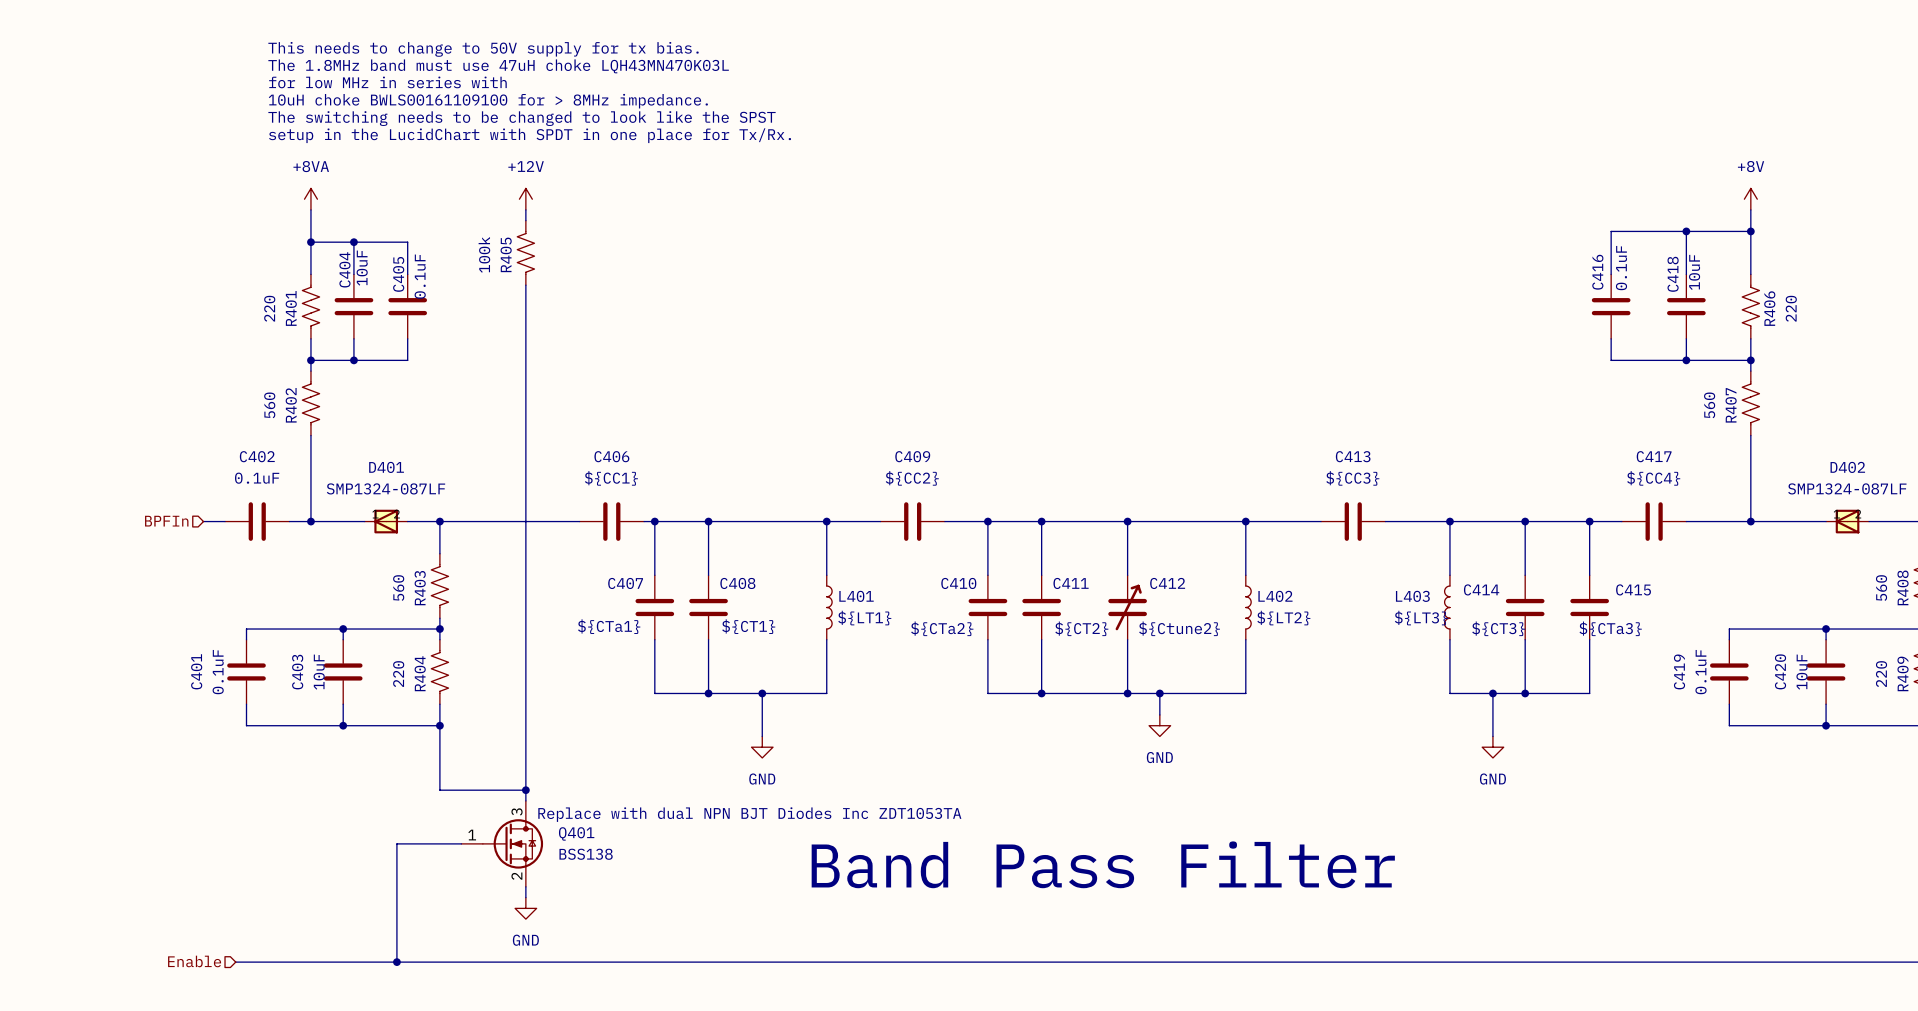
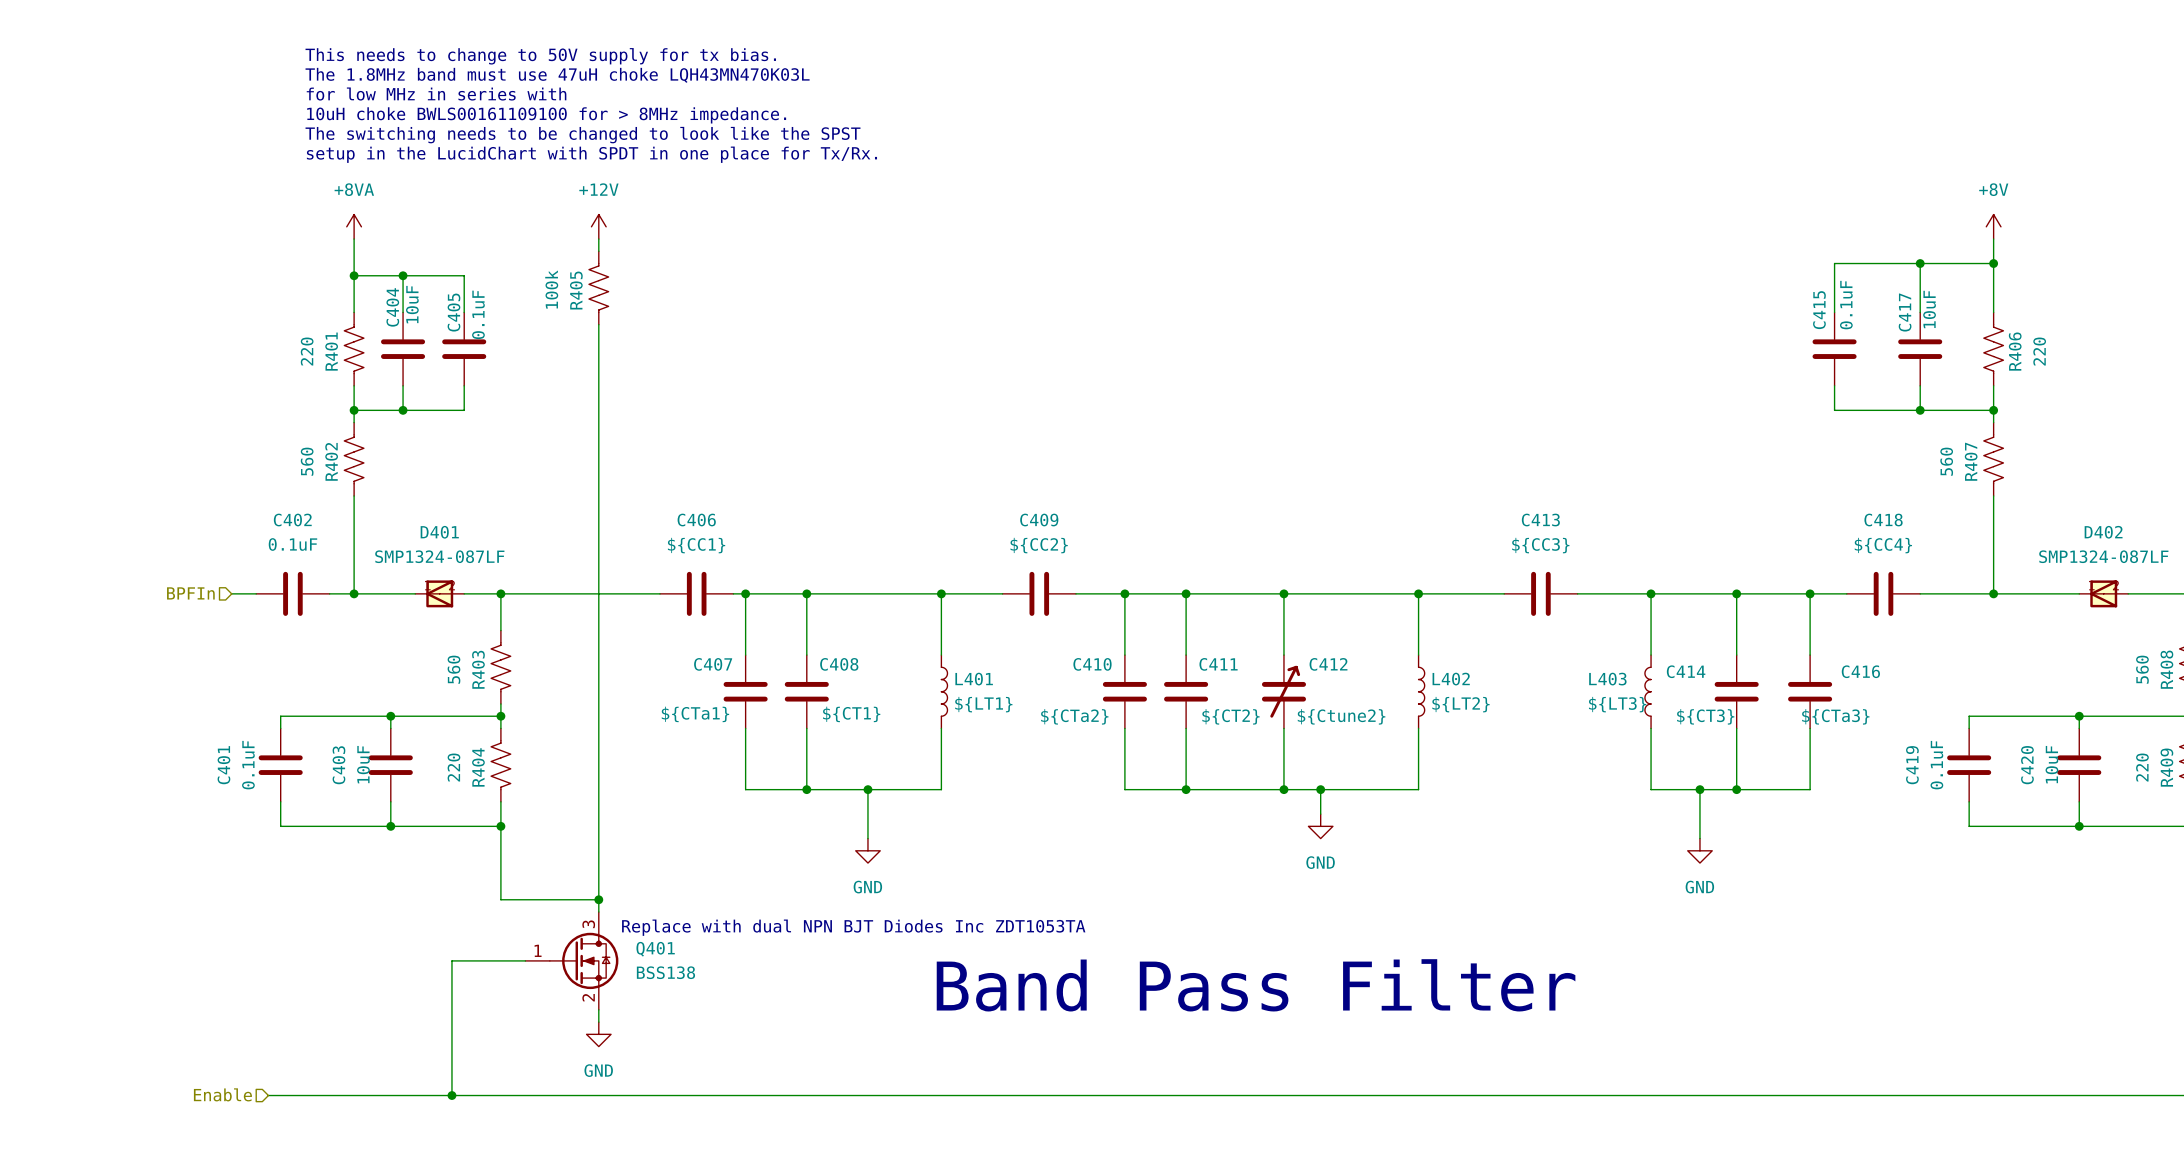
C416 name: C416 (1597, 272) -> C415 (1819, 310)
C418 name: C418 (1673, 274) -> C417 (1905, 312)
C417 name: C417 (1654, 456) -> C418 (1883, 520)
C415 name: C415 (1633, 589) -> C416 (1860, 671)

